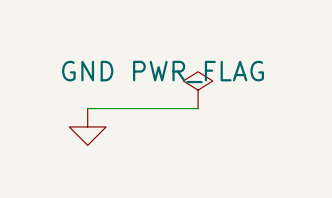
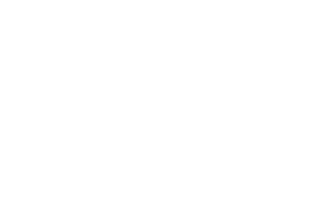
power symbol: PWR_FLAG (198, 90) -> none
wire: (87, 108) (198, 108) -> none
power symbol: GND (87, 126) -> none

